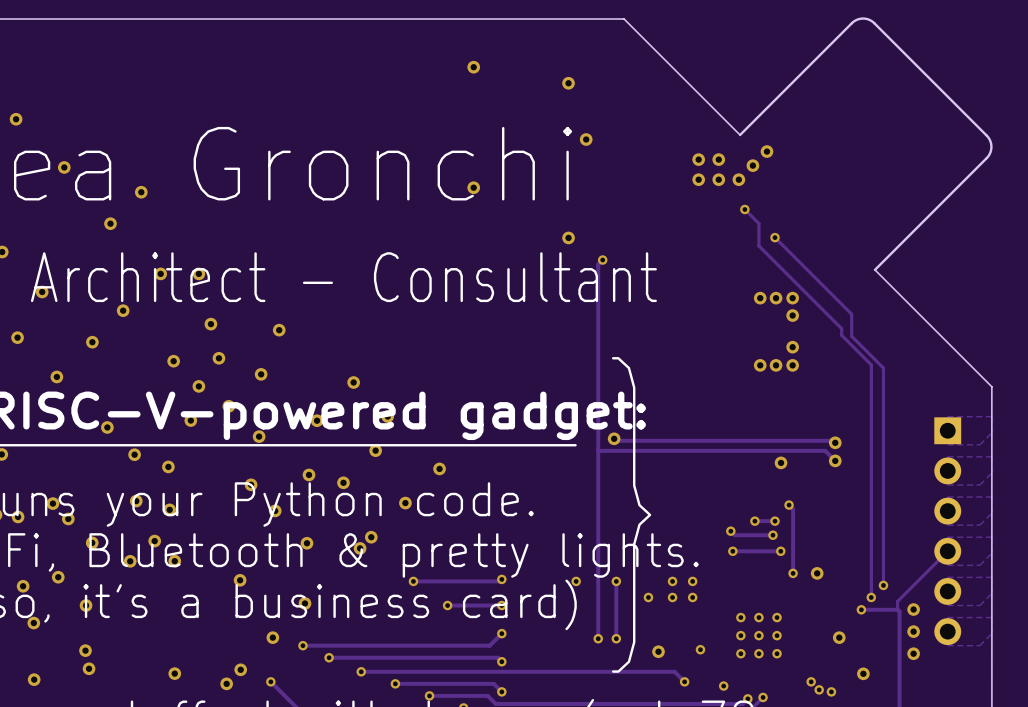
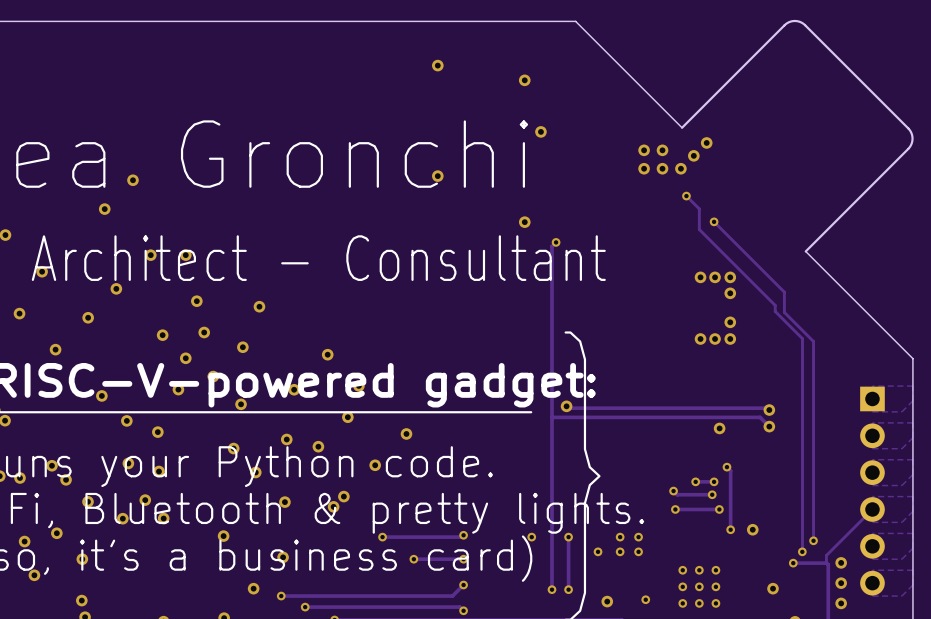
via: (16, 119) -> none
via: (64, 167) -> none

